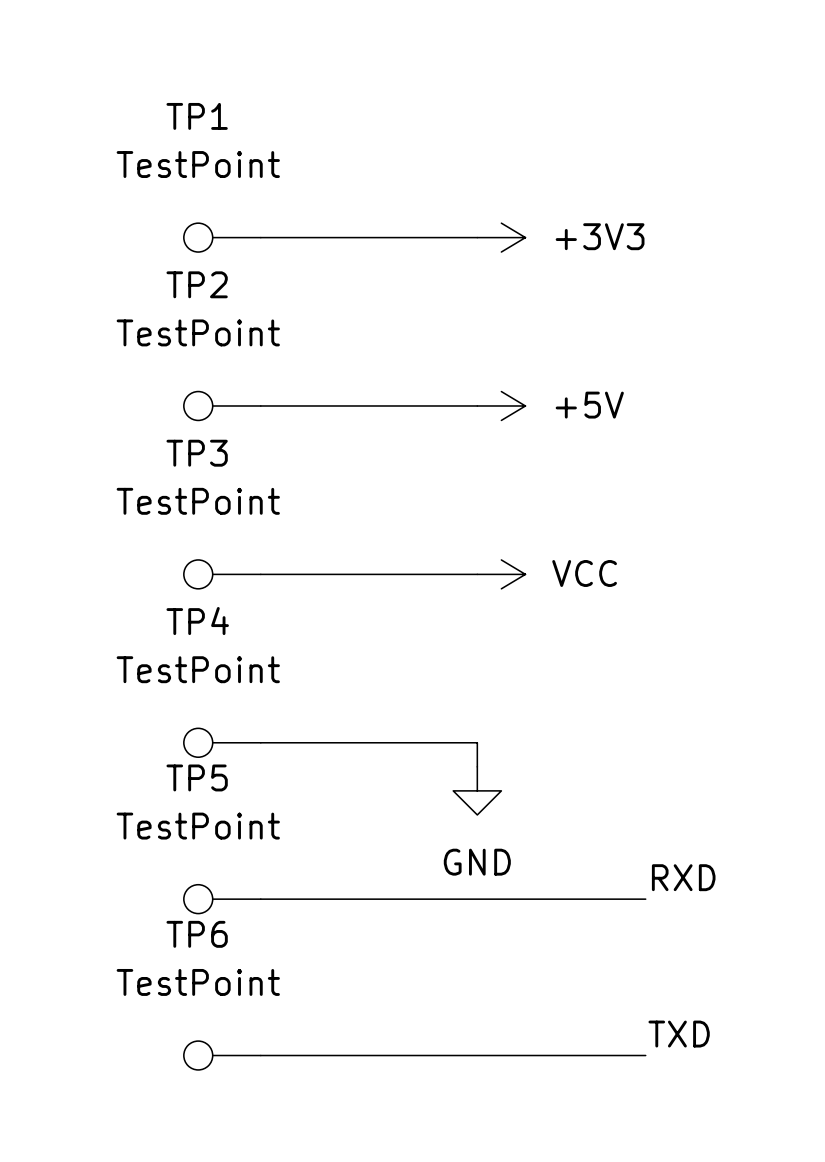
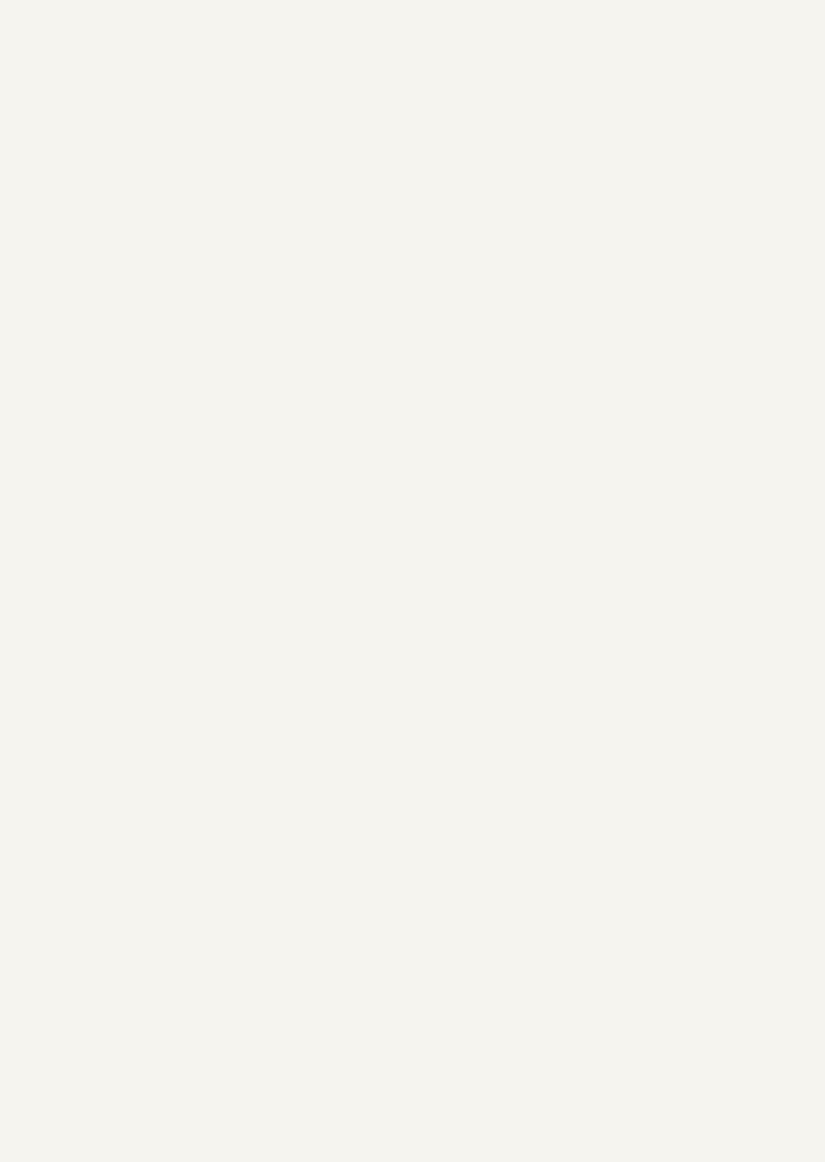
TP1: TestPoint (222, 237) -> none
wire: (260, 237) (477, 237) -> none
power symbol: +3V3 (501, 237) -> none
TP2: TestPoint (222, 405) -> none
wire: (260, 405) (477, 405) -> none
power symbol: +5V (501, 405) -> none
TP3: TestPoint (222, 574) -> none
wire: (260, 574) (477, 574) -> none
power symbol: VCC (501, 574) -> none
TP4: TestPoint (222, 742) -> none
wire: (260, 742) (477, 742) (477, 766) -> none
power symbol: GND (477, 790) -> none
label: RXD (683, 877) -> none
TP5: TestPoint (222, 899) -> none
wire: (260, 899) (645, 899) -> none
label: TXD (679, 1034) -> none
TP6: TestPoint (222, 1055) -> none
wire: (260, 1055) (645, 1055) -> none

